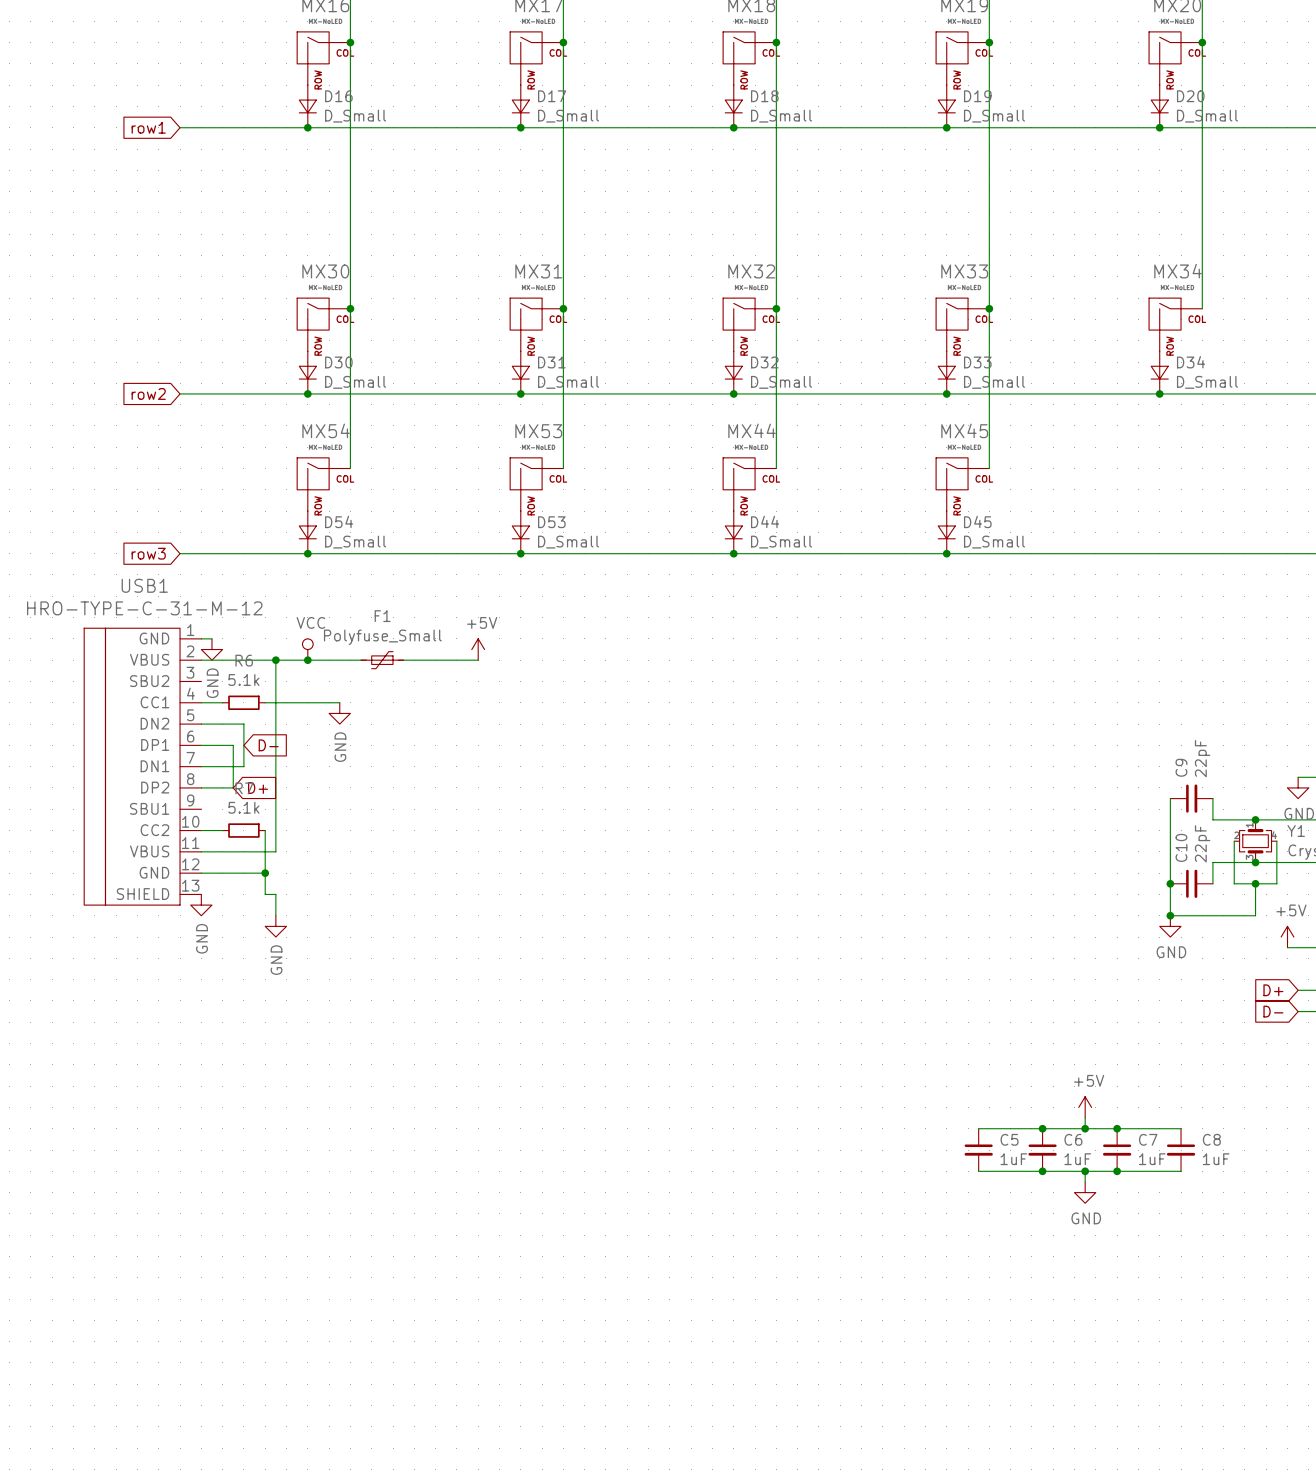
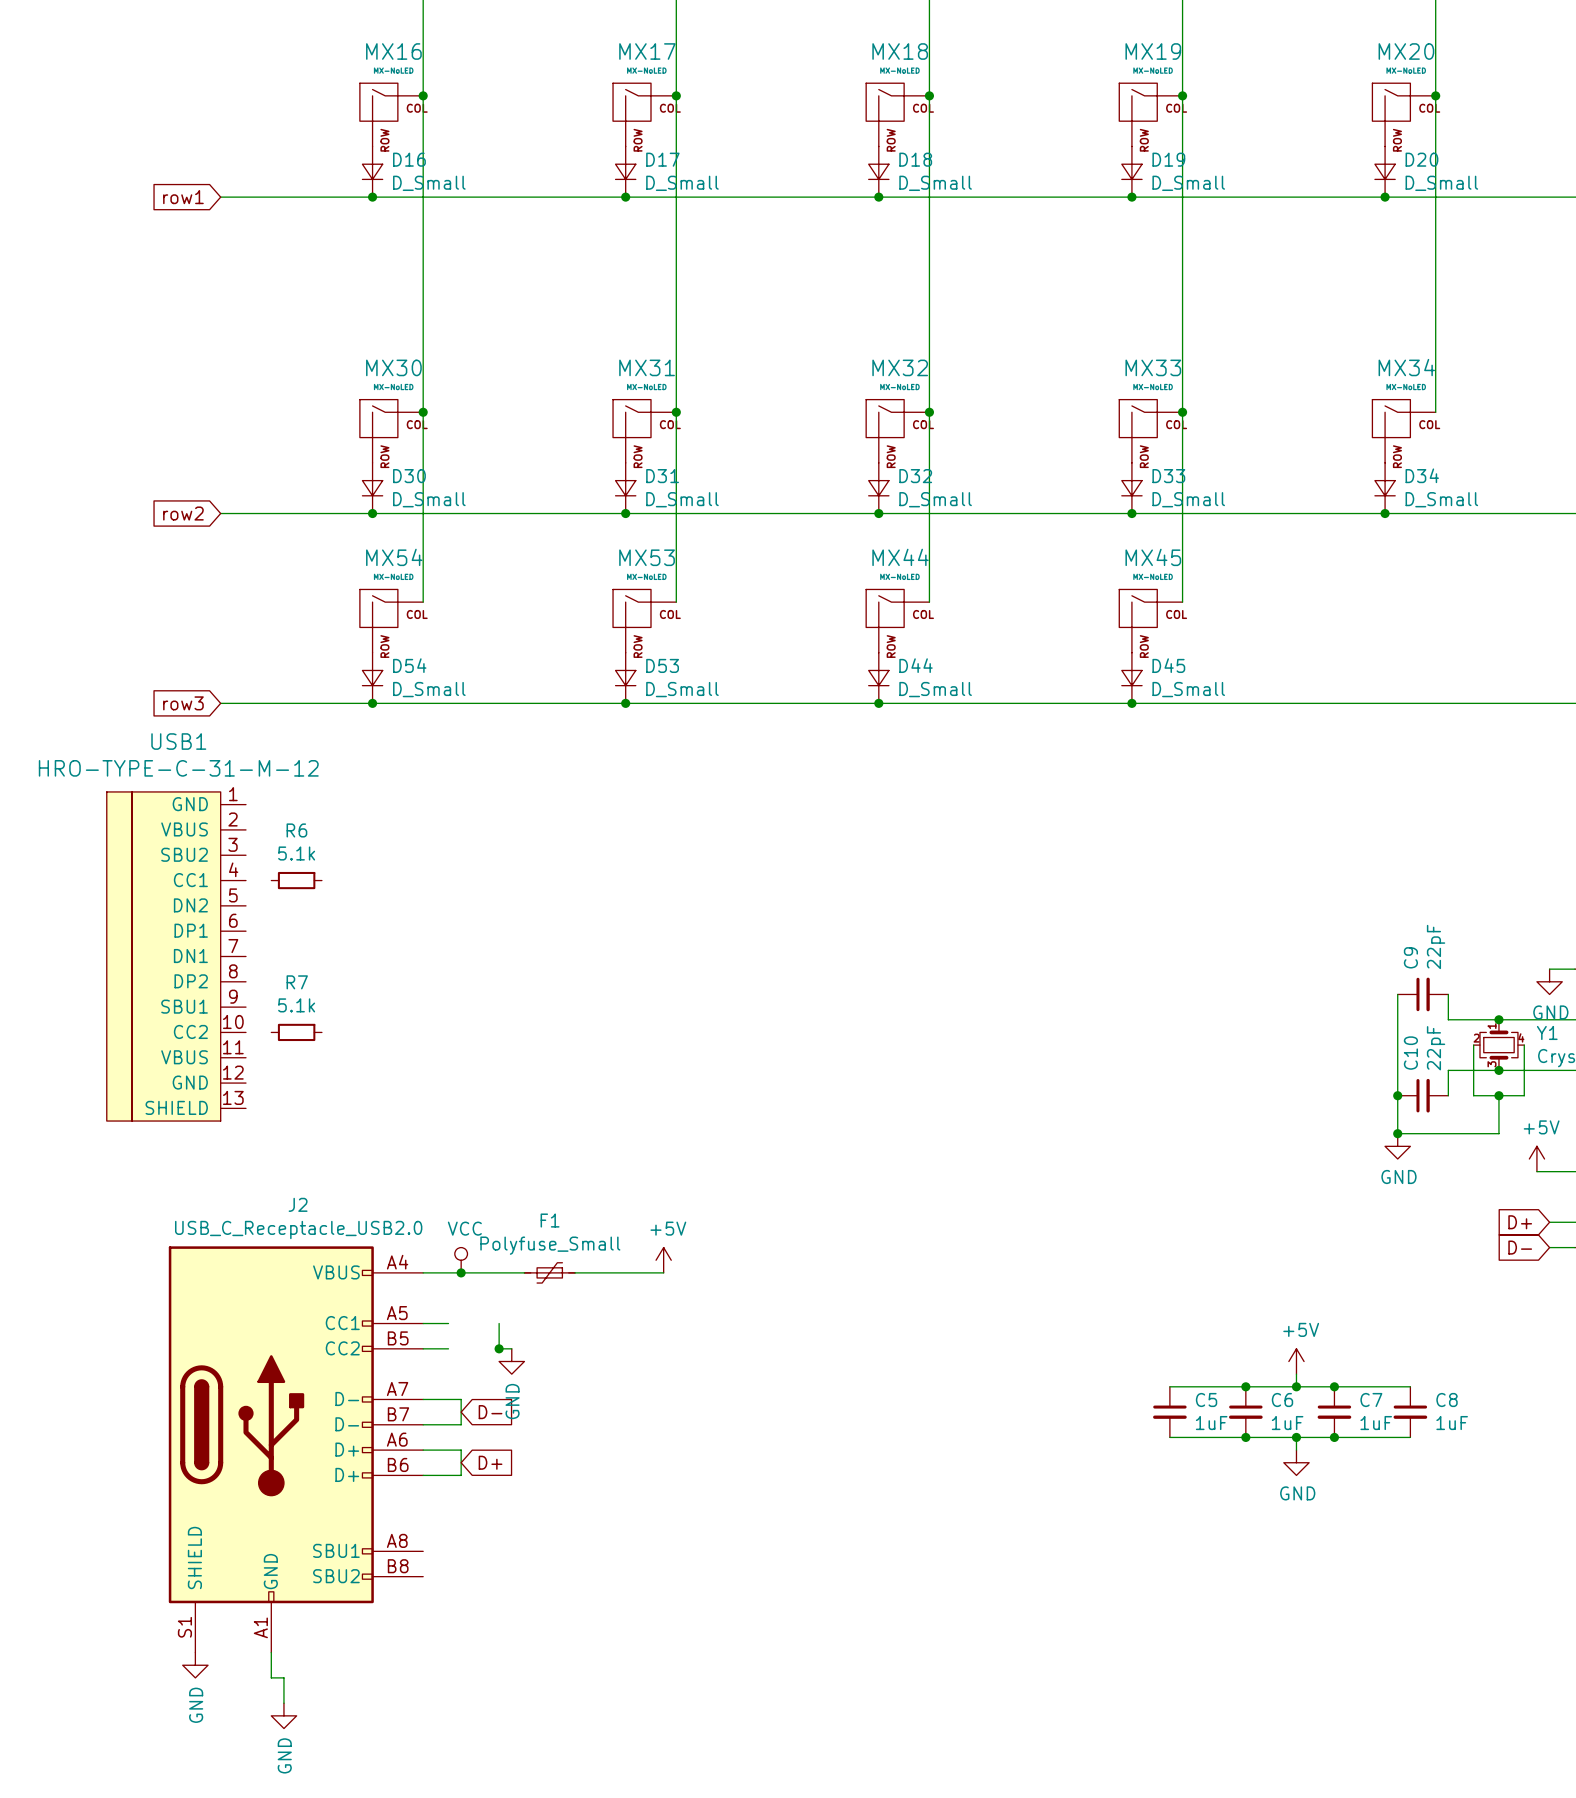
wire: (201, 638) (211, 638) -> none
power symbol: GND (211, 649) -> none
power symbol: VCC (307, 649) -> none
power symbol: +5V (478, 649) -> none
wire: (201, 660) (361, 660) -> none
wire: (275, 660) (275, 851) (201, 851) -> none
junction: (275, 660) -> none
junction: (307, 660) -> none
F1 position: (382, 660) -> (549, 1272)
wire: (403, 660) (478, 660) -> none
wire: (201, 702) (222, 702) -> none
wire: (265, 702) (339, 702) -> none
power symbol: GND (339, 713) -> none
wire: (201, 724) (243, 724) (243, 766) (201, 766) -> none
wire: (201, 745) (233, 745) (233, 787) (201, 787) -> none
global label: D- (268, 745) -> none
global label: D+ (258, 787) -> none
wire: (201, 830) (222, 830) -> none
wire: (265, 830) (265, 894) (275, 894) (275, 915) -> none
wire: (201, 873) (265, 873) -> none
junction: (265, 873) -> none
power symbol: GND (201, 905) -> none
power symbol: GND (275, 926) -> none
power symbol: none -> VCC (461, 1260)
power symbol: none -> +5V (663, 1260)
wire: none -> (423, 1272) (524, 1272)
junction: none -> (461, 1272)
wire: none -> (575, 1272) (663, 1272)
wire: none -> (423, 1323) (448, 1323)
wire: none -> (499, 1323) (499, 1348) (511, 1348)
wire: none -> (423, 1348) (448, 1348)
junction: none -> (499, 1348)
power symbol: none -> GND (511, 1361)
wire: none -> (423, 1399) (461, 1399) (461, 1424) (423, 1424)
global label: none -> D- (490, 1412)
J2: none -> USB_C_Receptacle_USB2.0 (295, 1449)
wire: none -> (423, 1450) (461, 1450) (461, 1475) (423, 1475)
global label: none -> D+ (490, 1462)
wire: none -> (271, 1652) (271, 1677) (283, 1677) (283, 1703)
power symbol: none -> GND (195, 1665)
power symbol: none -> GND (283, 1715)

